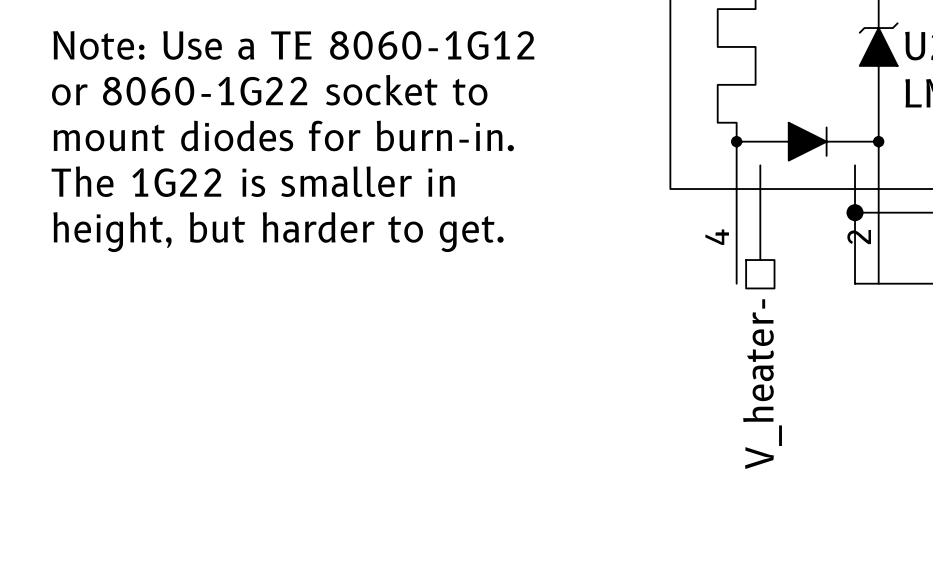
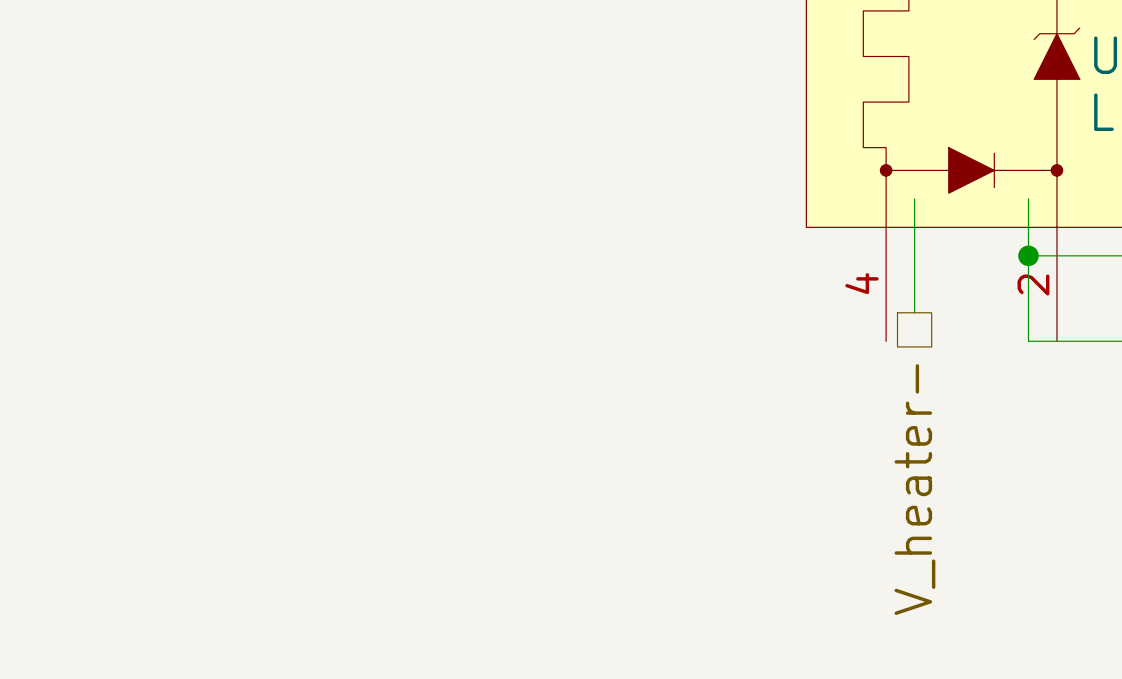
text: Note: Use a TE 8060-1G12 (293, 45) -> none
text: or 8060-1G22 socket to (269, 90) -> none
text: mount diodes for burn-in. (283, 135) -> none
text: The 1G22 is smaller in (253, 181) -> none
text: height, but harder to get. (278, 232) -> none

